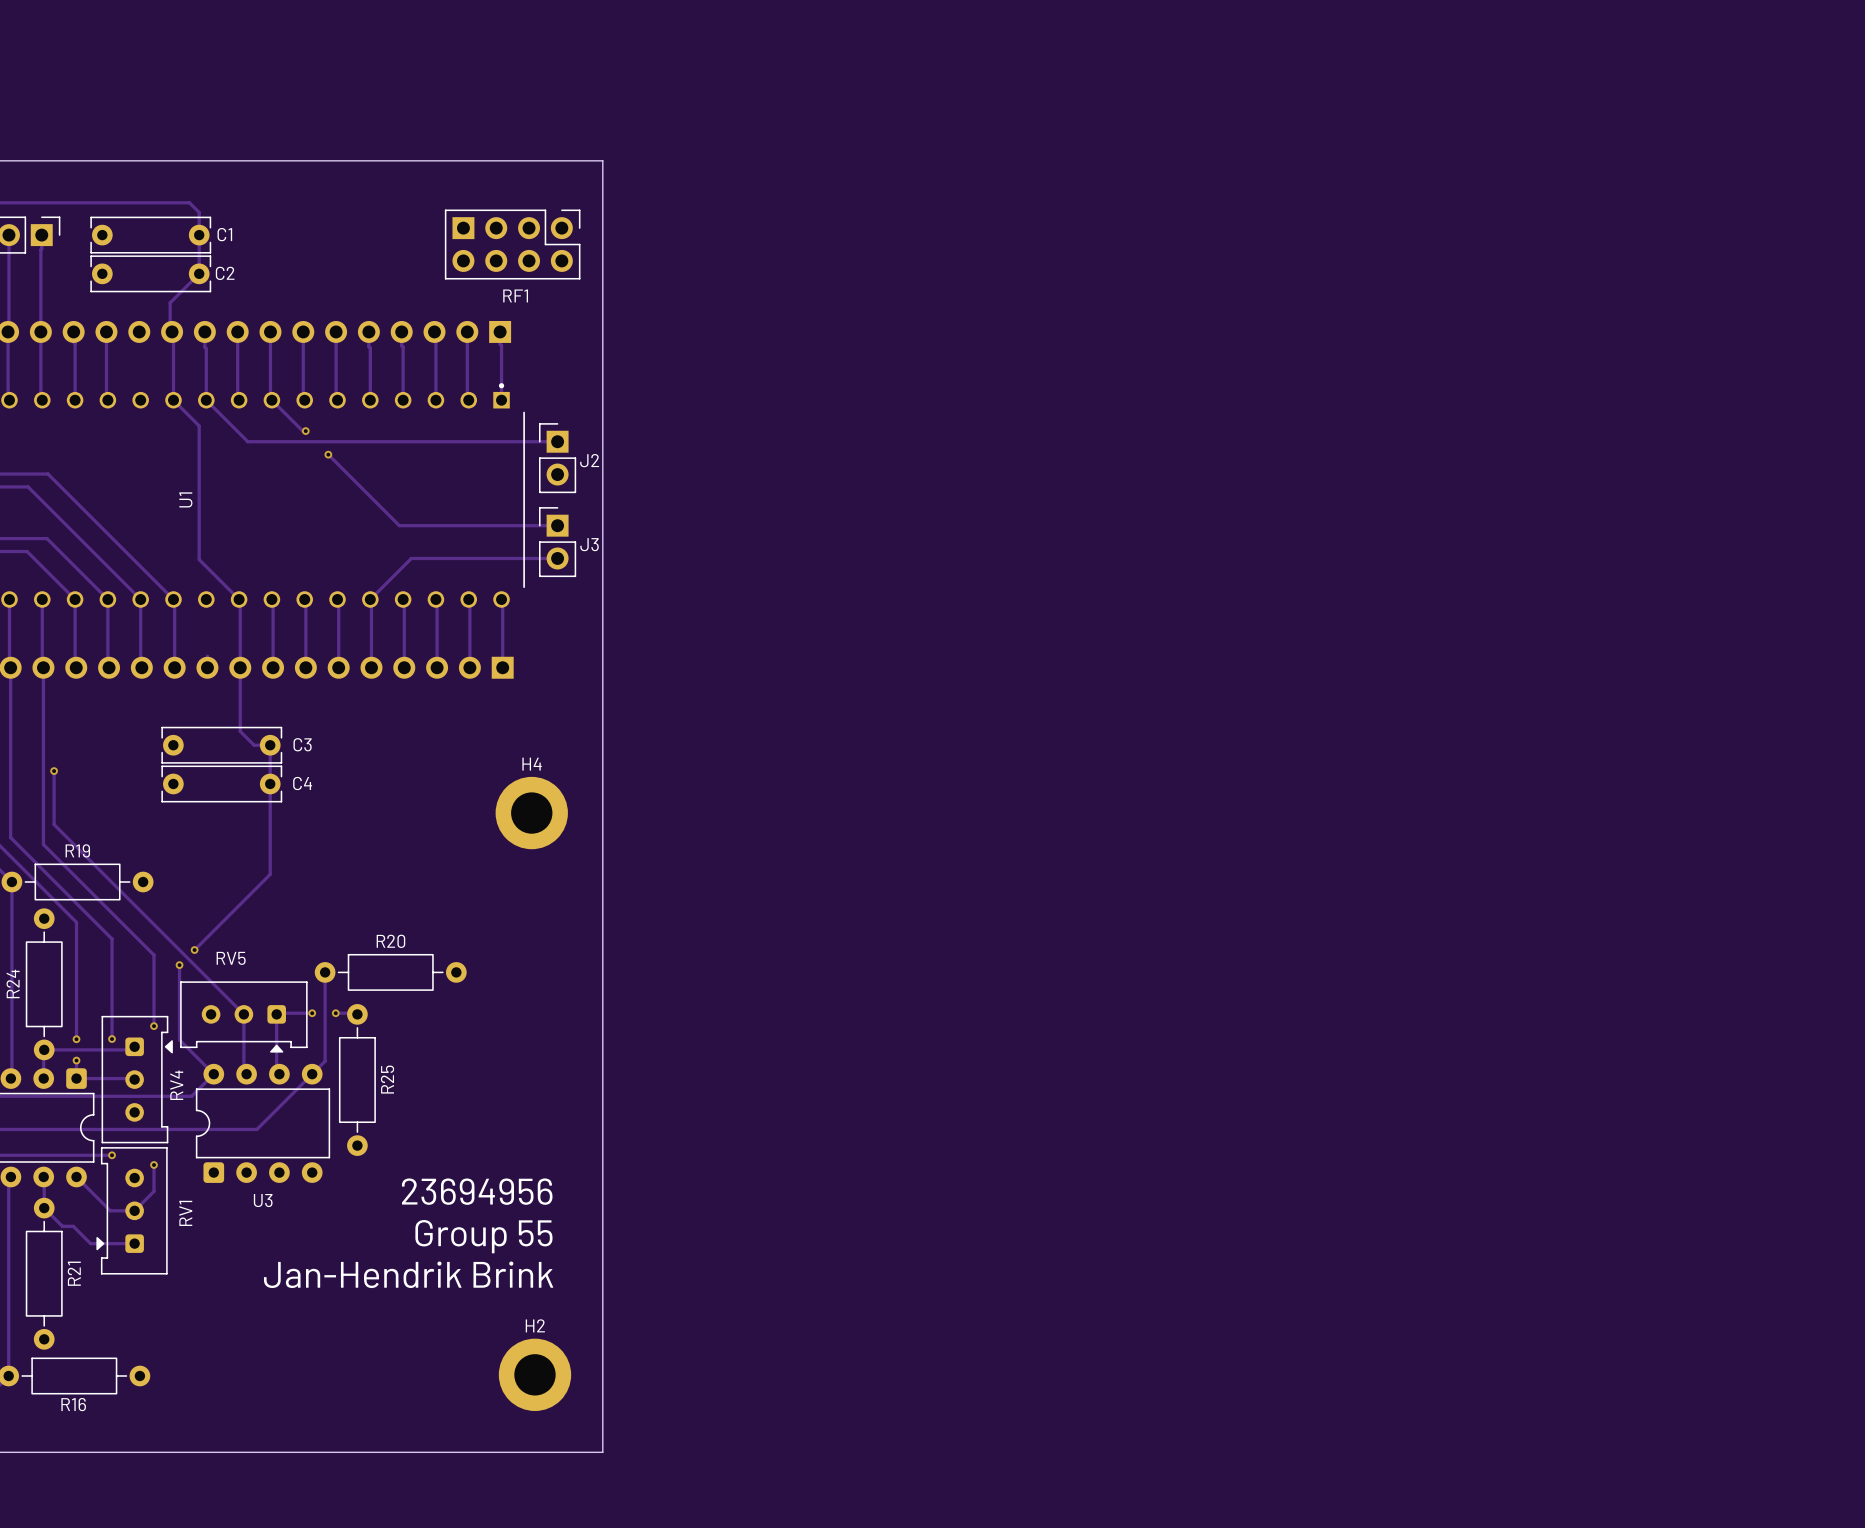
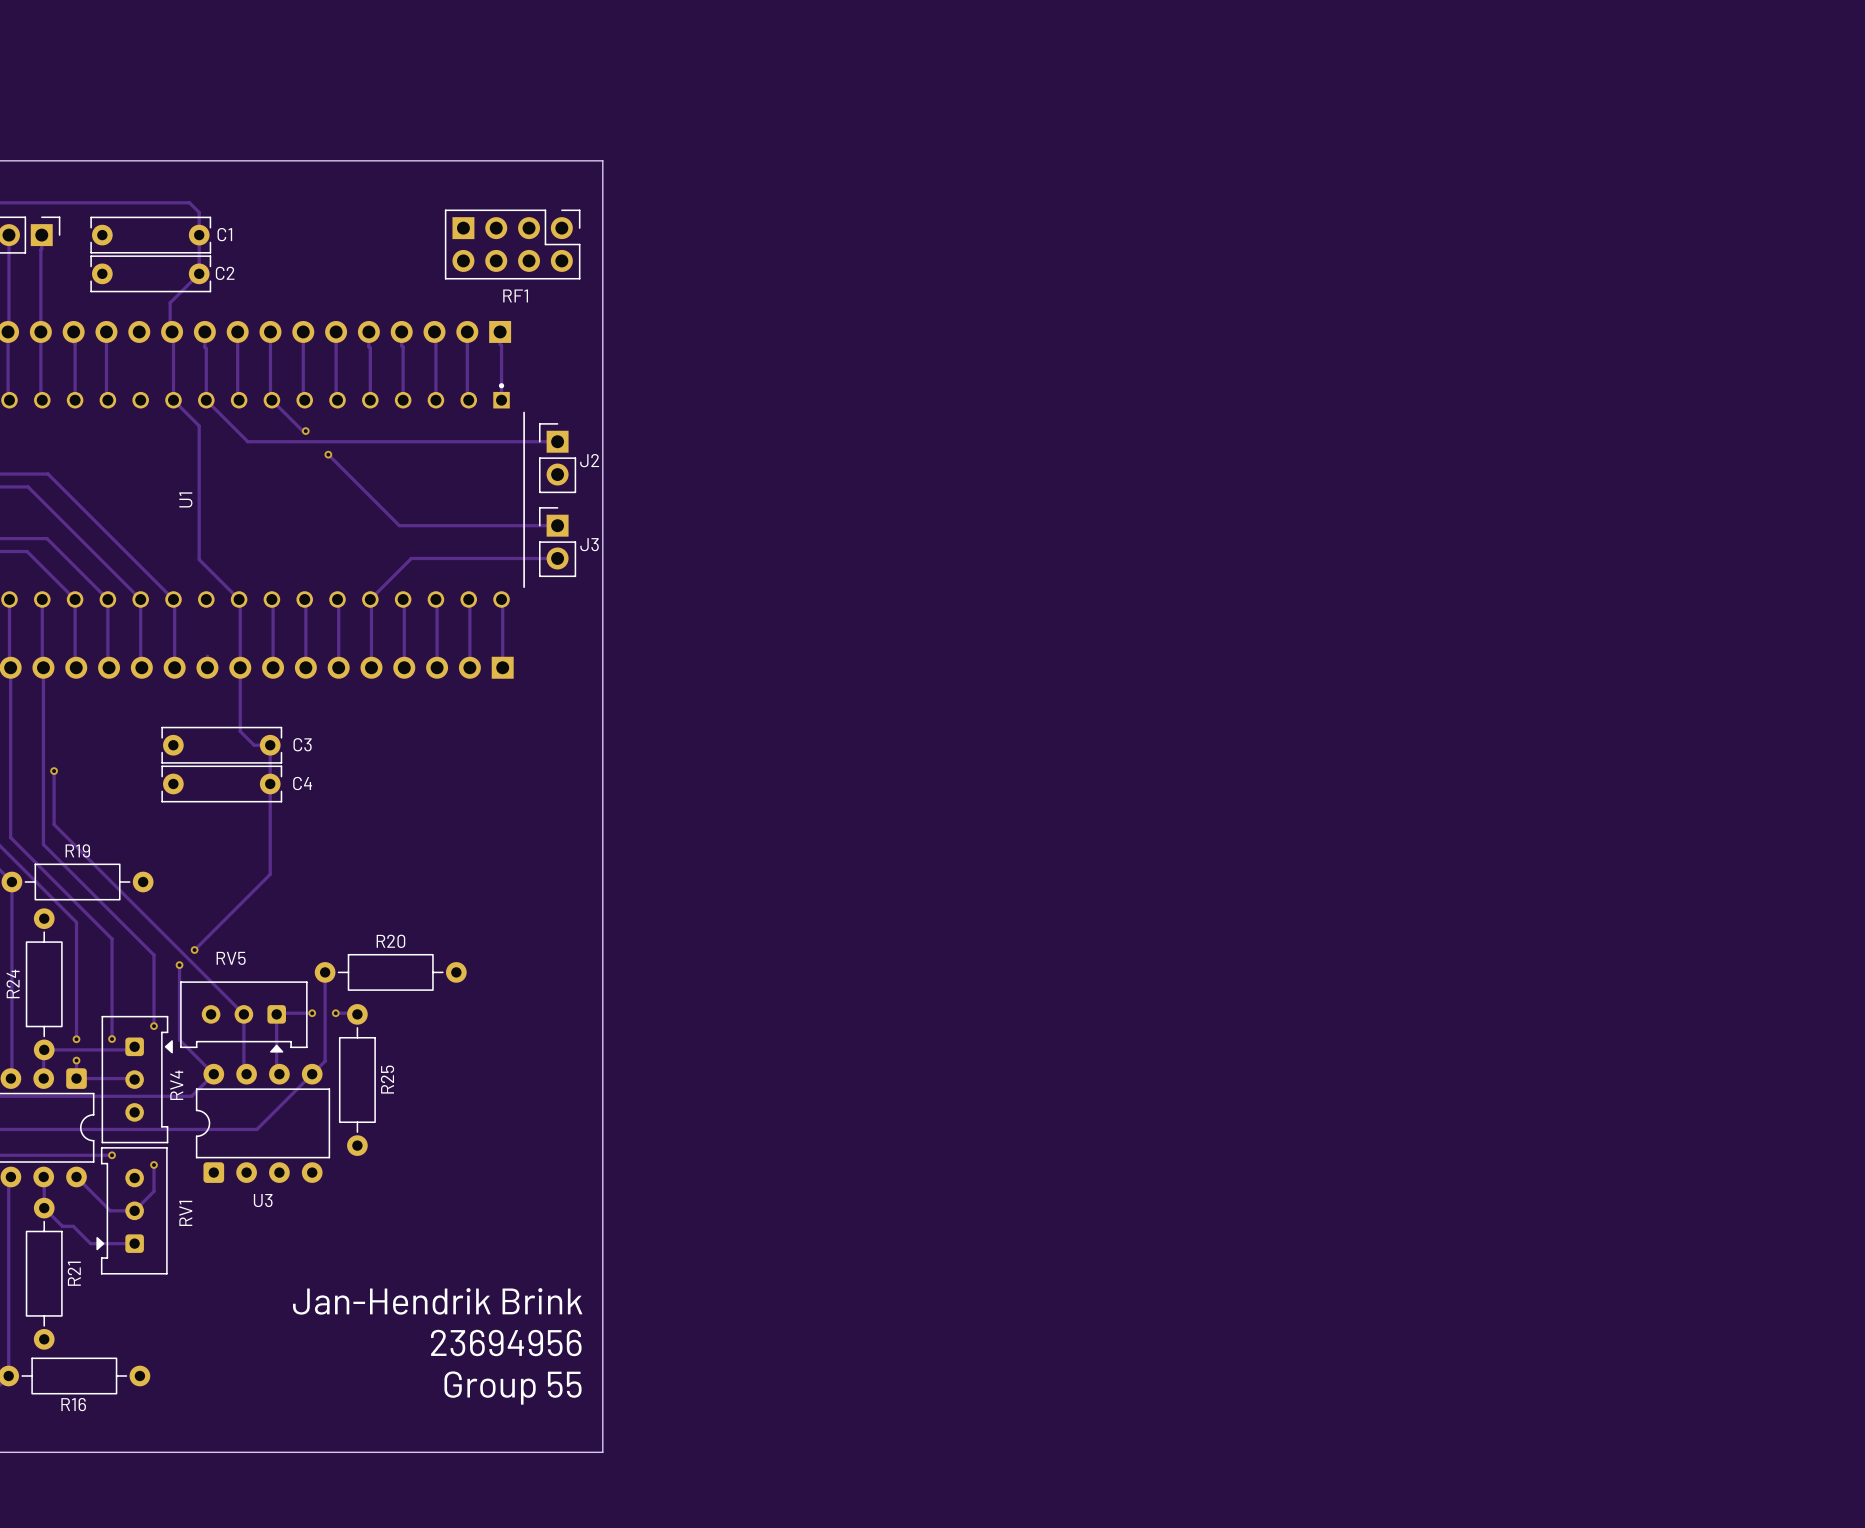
H4: (531, 813) -> none
text position: 23694956 (477, 1191) -> 23694956 (506, 1343)
text position: Group 55 (483, 1236) -> Group 55 (513, 1388)
text position: Jan-Hendrik Brink (408, 1274) -> Jan-Hendrik Brink (437, 1301)
H2: (534, 1374) -> none

